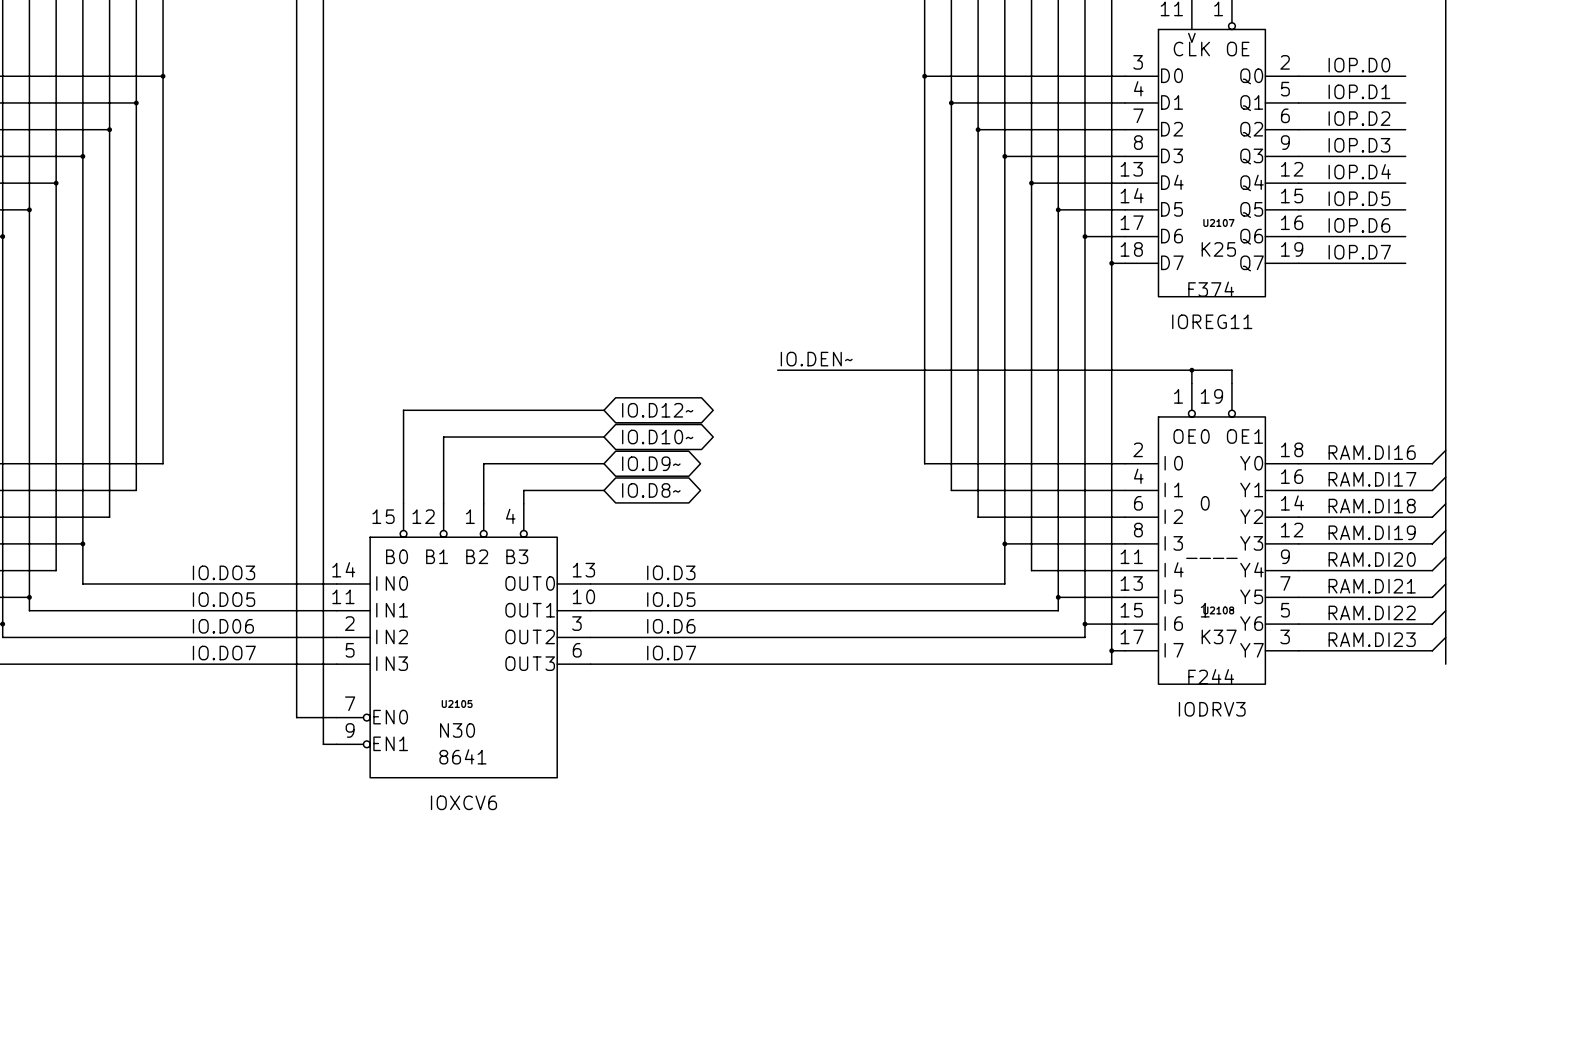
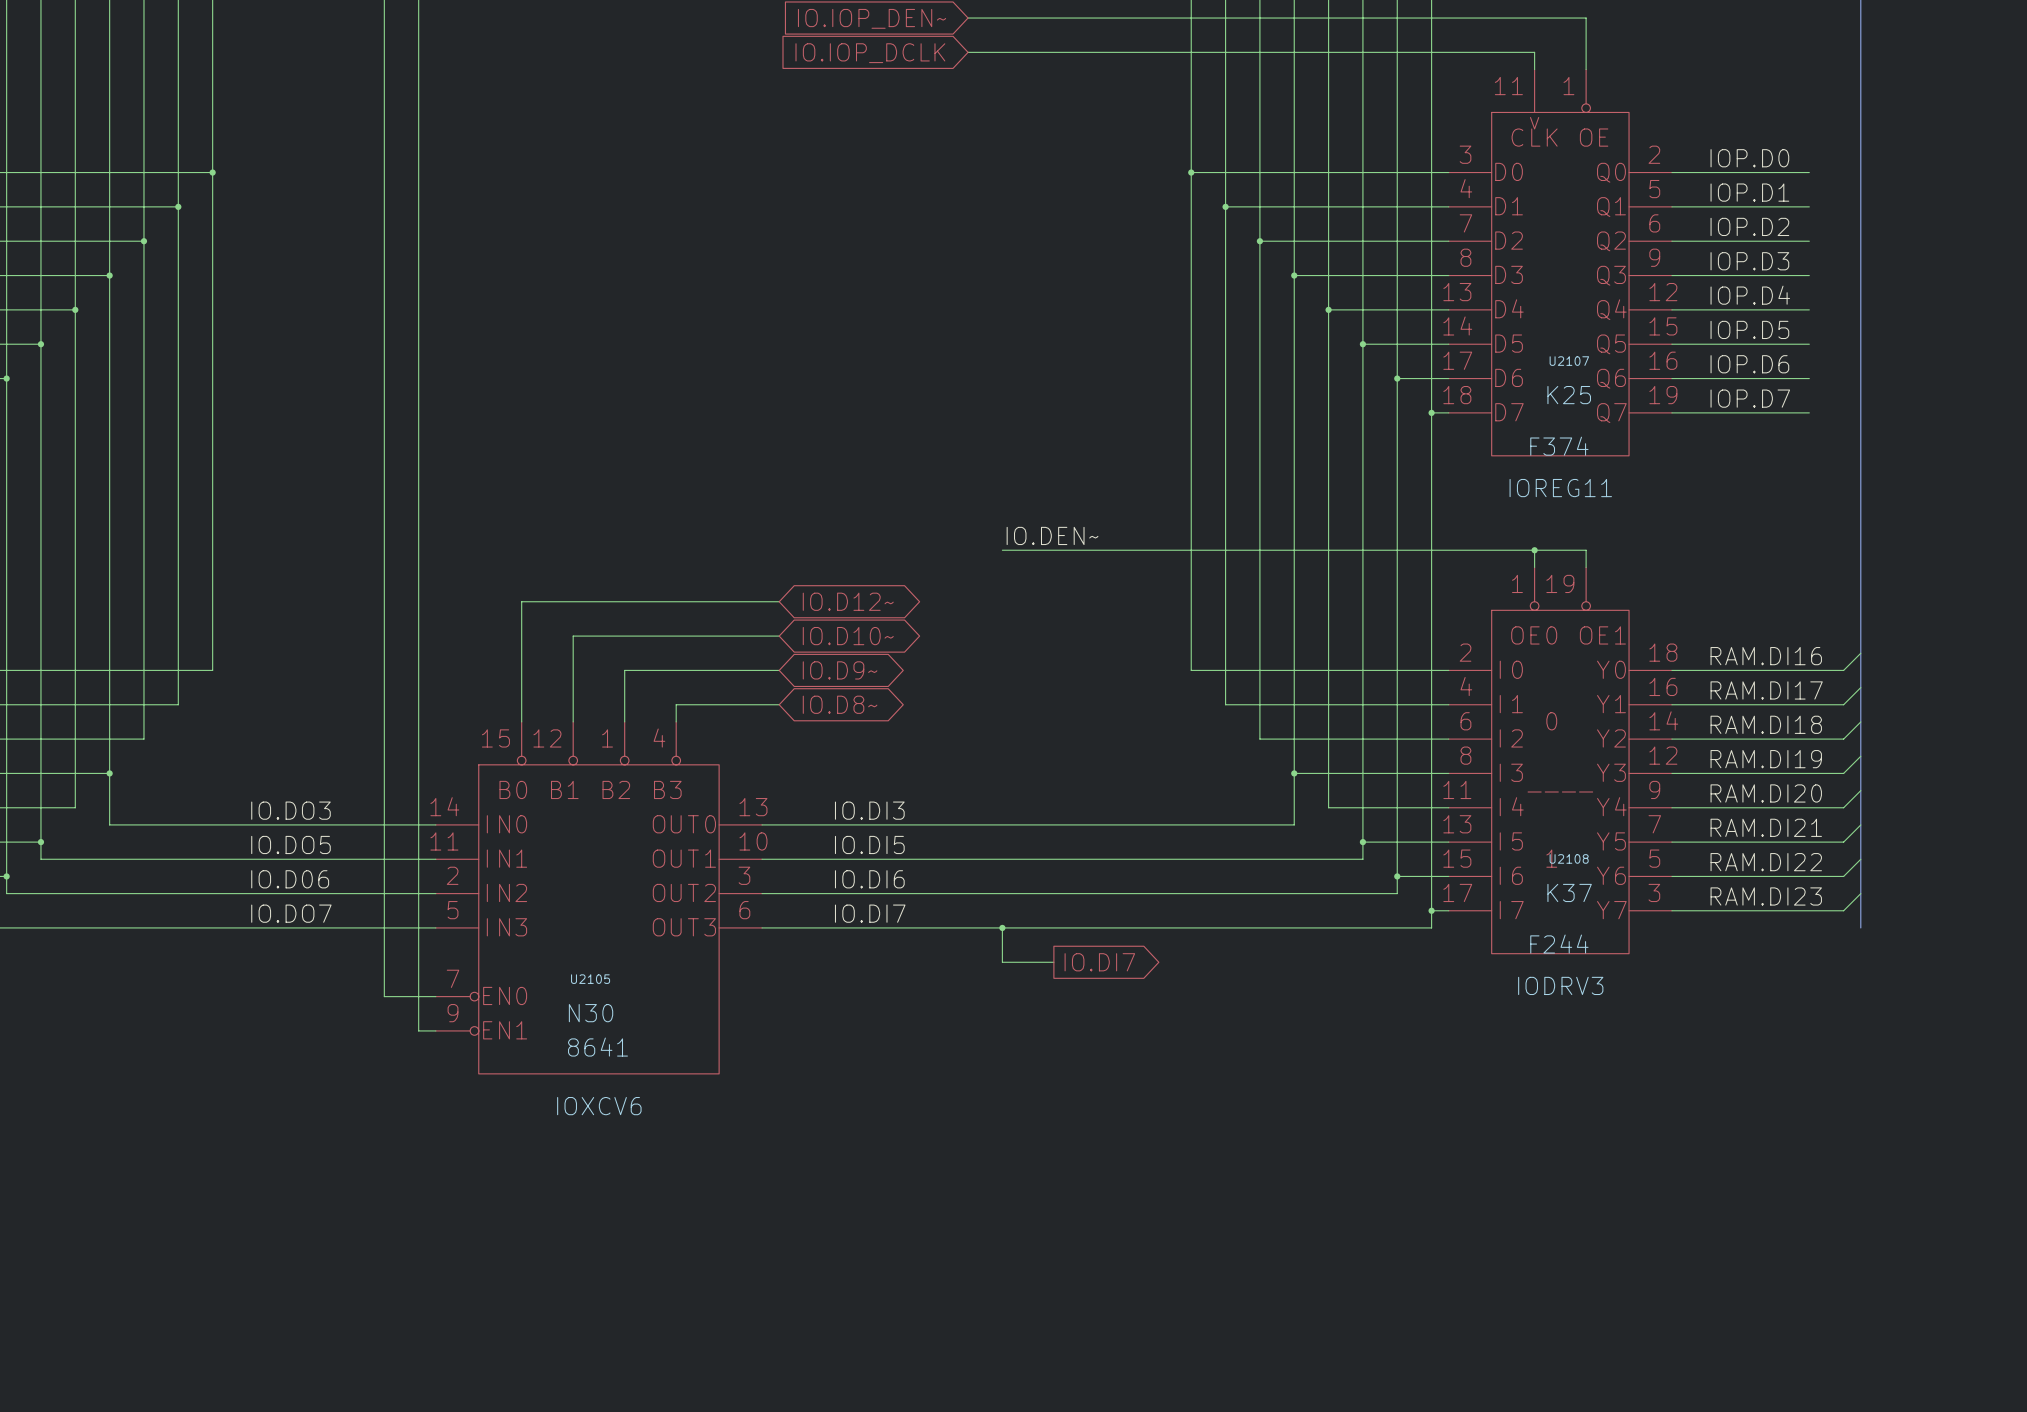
label: IO.D3 (671, 572) -> IO.DI3 (869, 810)
label: IO.D5 (671, 599) -> IO.DI5 (869, 844)
label: IO.D6 (671, 626) -> IO.DI6 (869, 879)
label: IO.D7 (671, 653) -> IO.DI7 (870, 913)
wire: none -> (1002, 927) (1002, 962) (1053, 962)
junction: none -> (1002, 927)
global label: none -> IO.DI7 (1099, 962)

